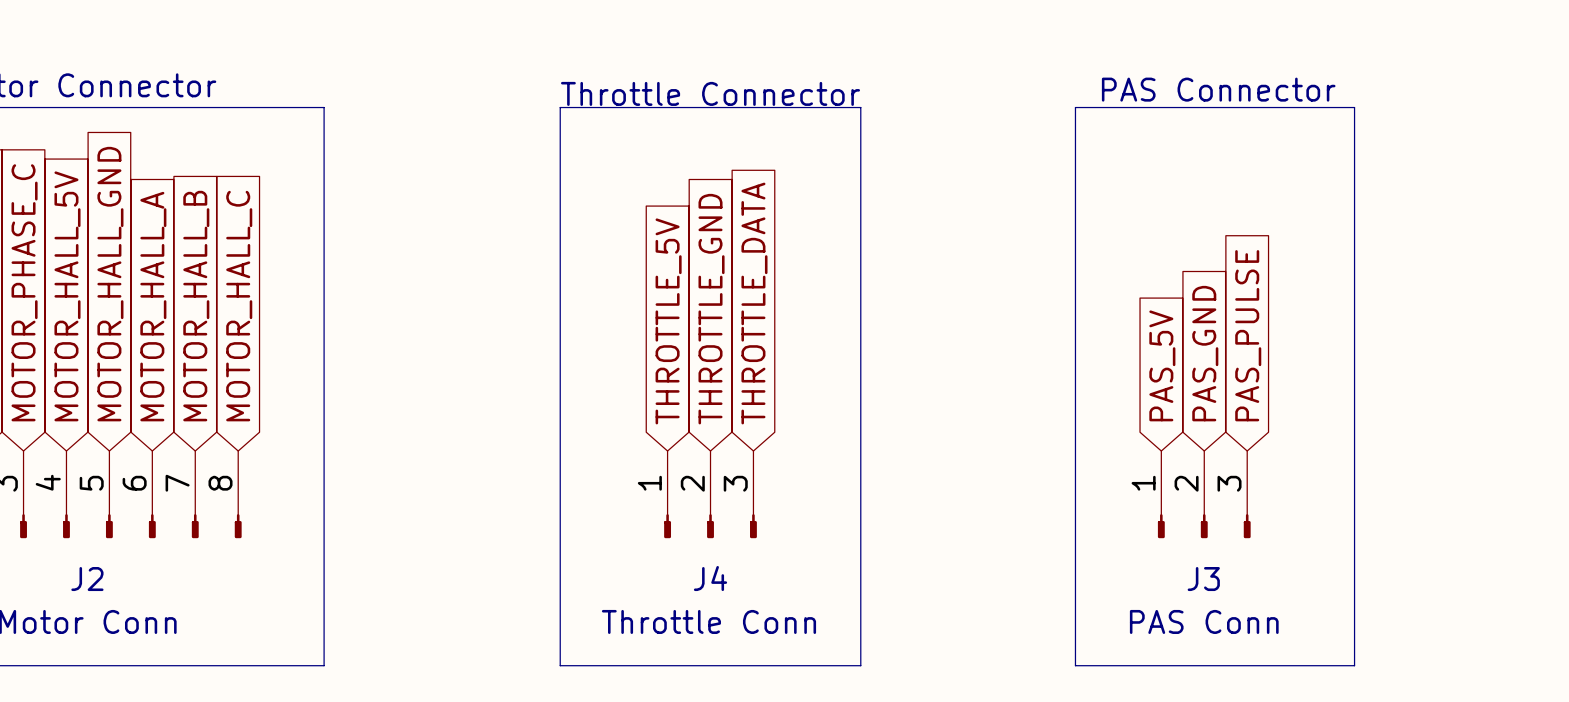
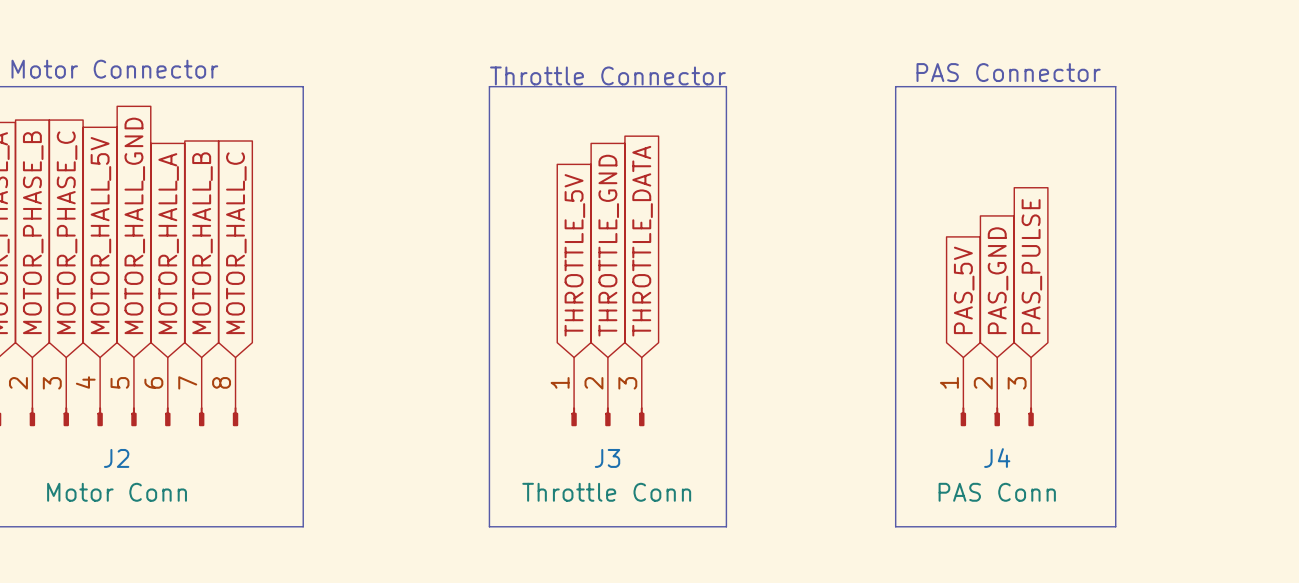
J4 name: J4 (710, 578) -> J3 (607, 458)
J3 name: J3 (1203, 579) -> J4 (997, 458)

